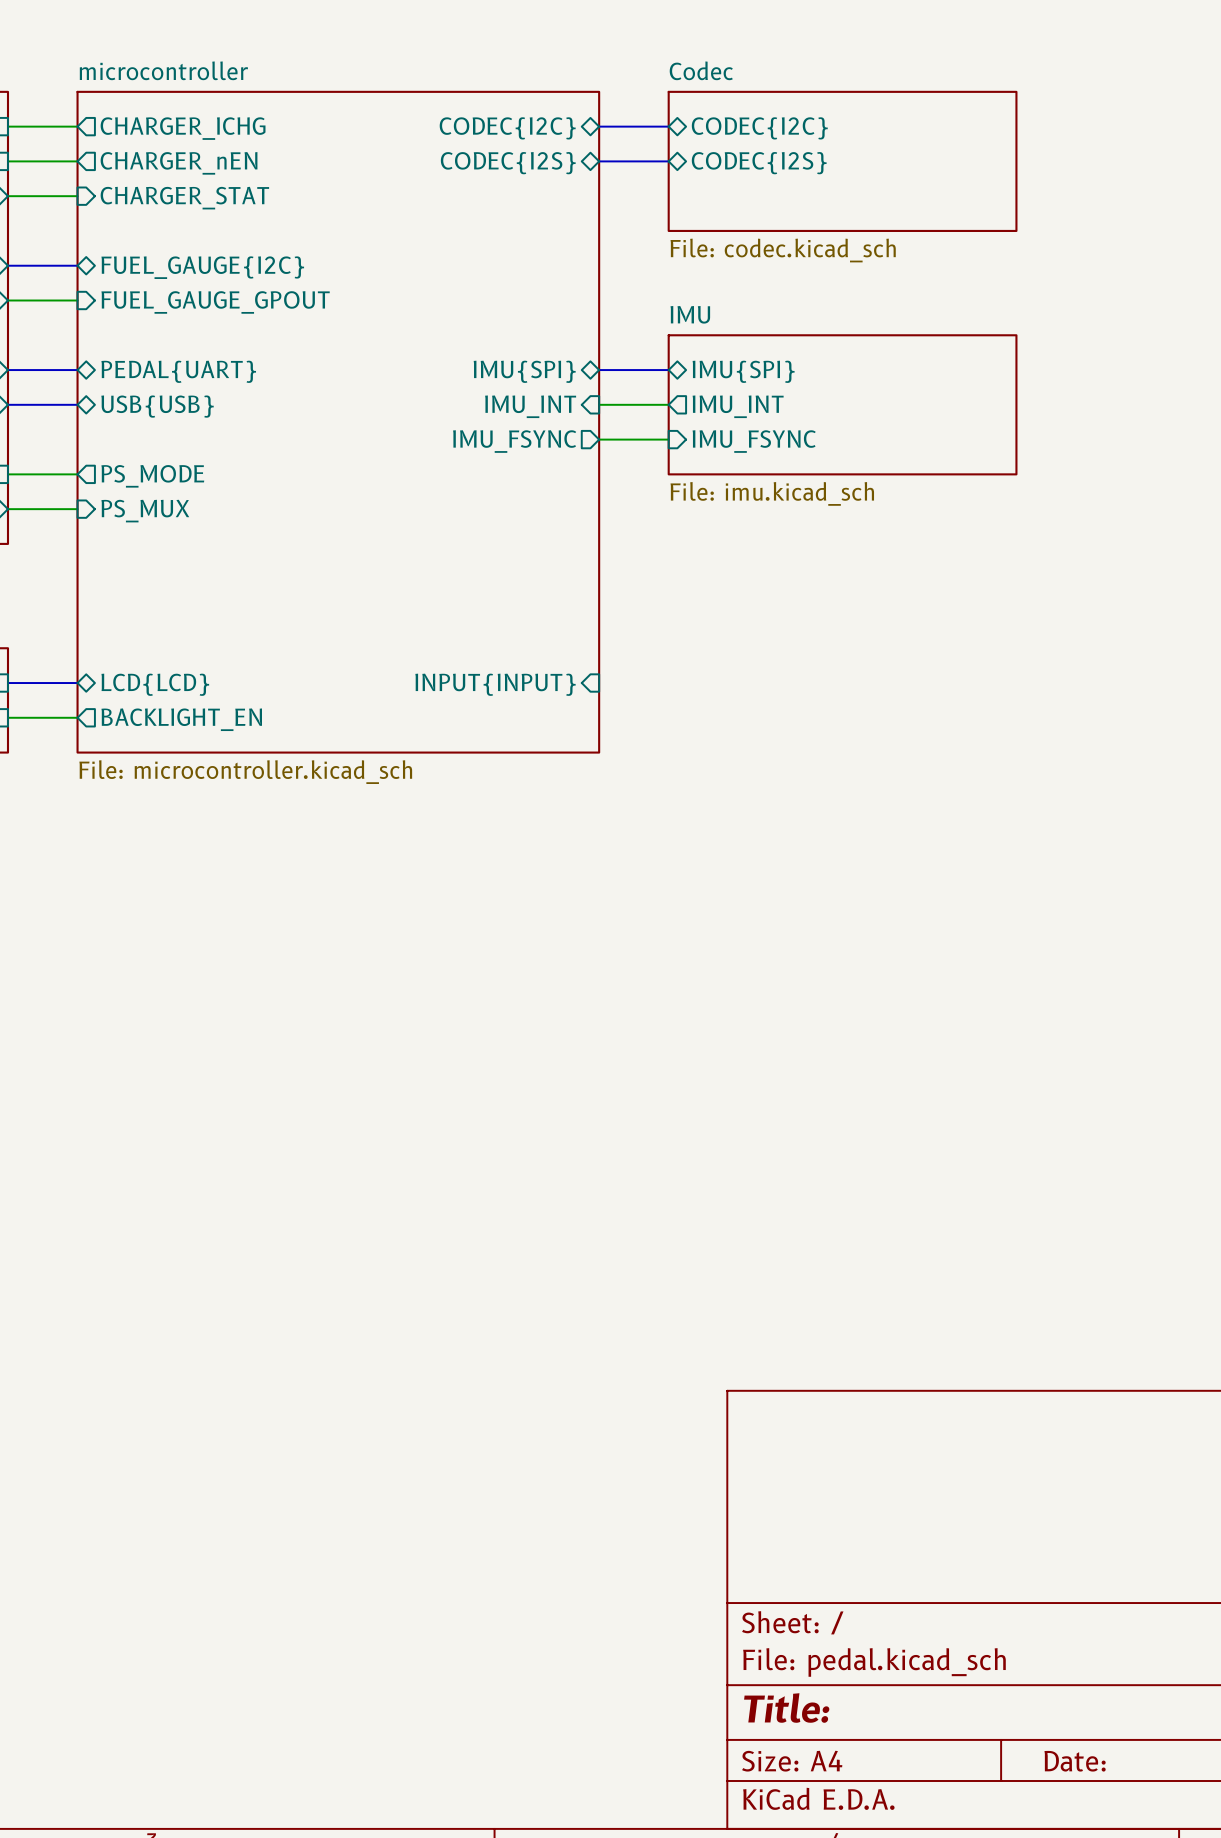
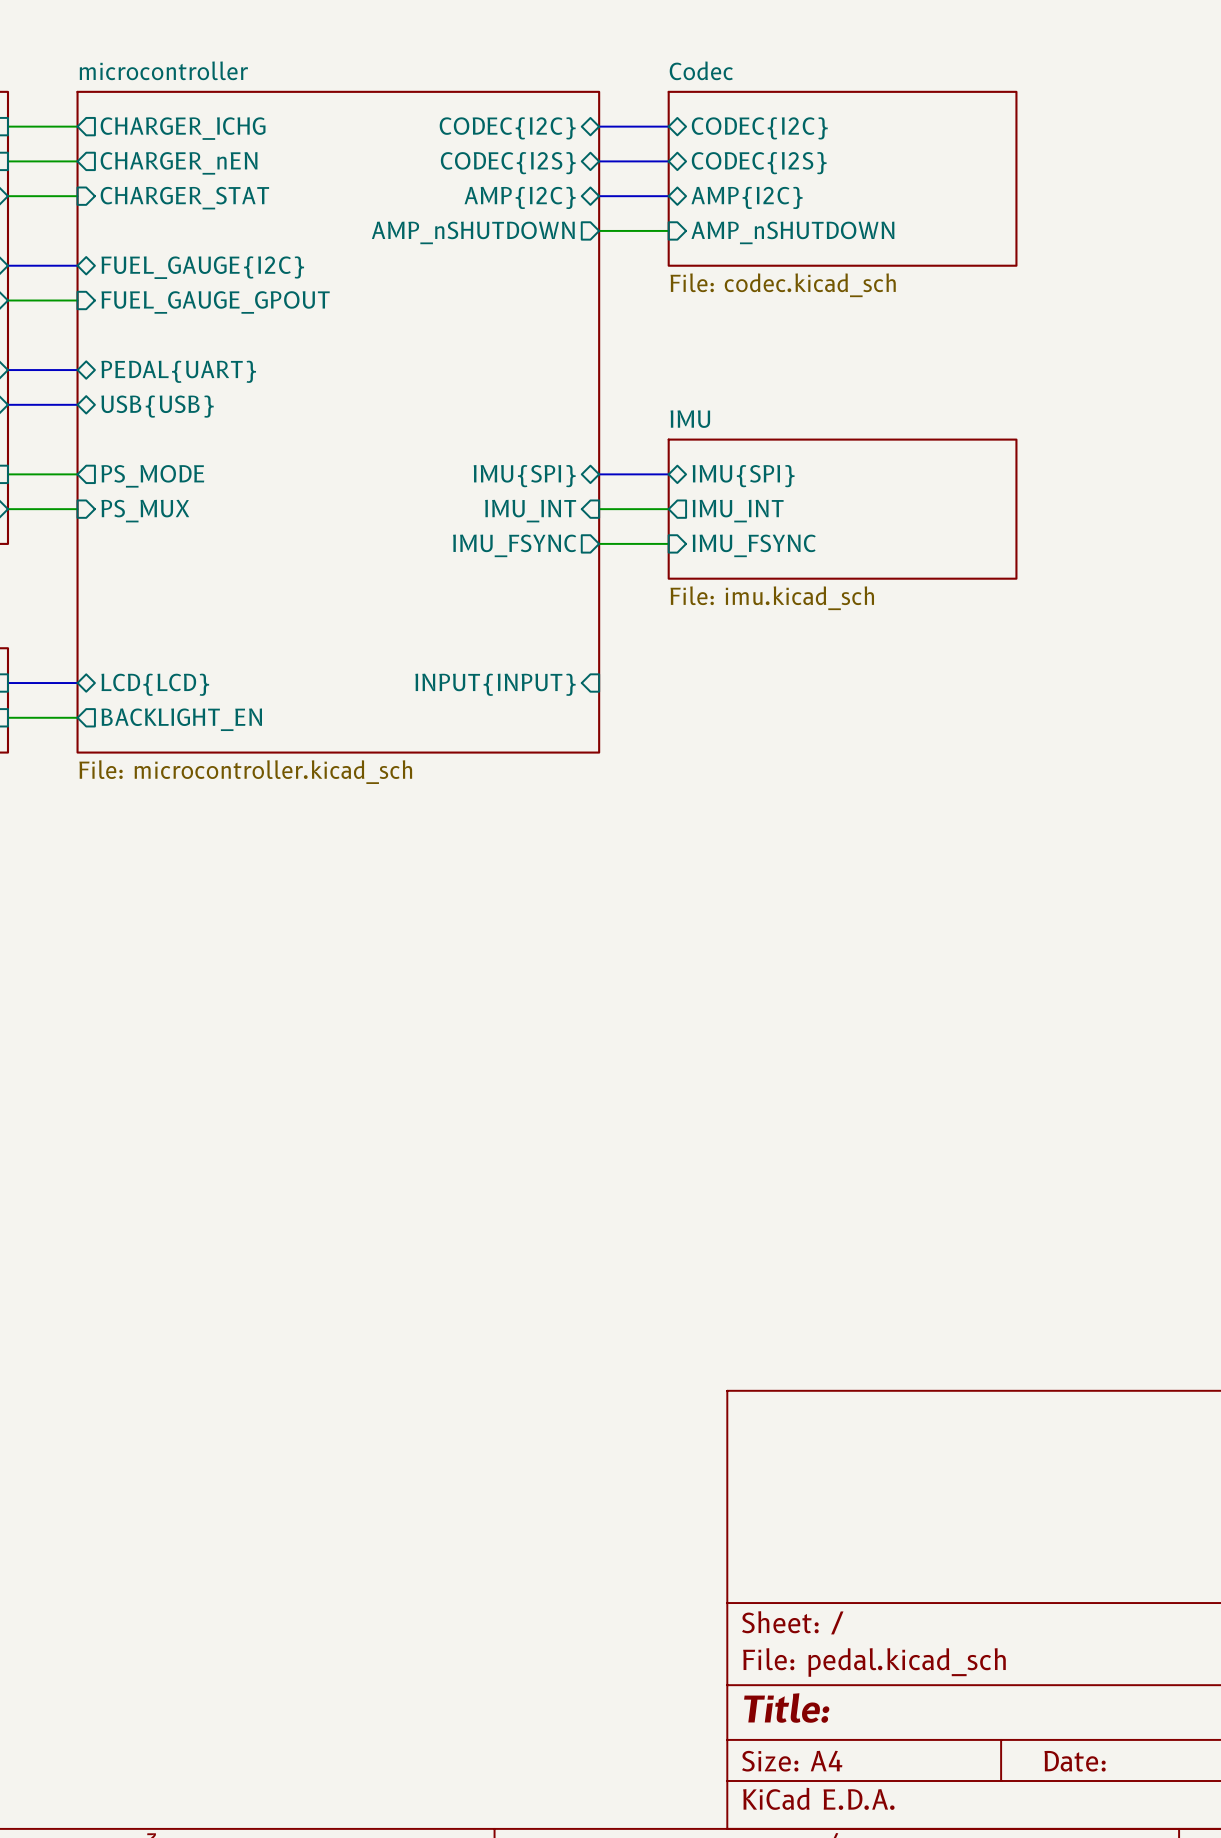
sheet Codec: File: codec.kicad_sch (842, 161) -> none
sheet Codec: none -> File: codec.kicad_sch (842, 178)
bus: none -> (599, 196) (668, 196)
sheet pin: none -> AMP{I2C} (520, 197)
sheet pin: none -> AMP{I2C} (747, 197)
wire: none -> (599, 230) (668, 230)
sheet pin: none -> AMP_nSHUTDOWN (473, 232)
sheet pin: none -> AMP_nSHUTDOWN (792, 232)
bus: (599, 370) (668, 370) -> (599, 474) (668, 474)
sheet pin: IMU{SPI} (524, 371) -> none
sheet pin: IMU{SPI} (743, 371) -> none
wire: (599, 404) (668, 404) -> (599, 509) (668, 509)
sheet IMU position: (842, 404) -> (842, 509)
sheet pin: IMU_INT (530, 406) -> none
sheet pin: IMU_INT (738, 406) -> none
wire: (599, 439) (668, 439) -> (599, 543) (668, 543)
sheet pin: IMU_FSYNC (514, 441) -> none
sheet pin: IMU_FSYNC (754, 441) -> none
sheet pin: none -> IMU{SPI} (524, 476)
sheet pin: none -> IMU{SPI} (743, 476)
sheet pin: none -> IMU_INT (530, 511)
sheet pin: none -> IMU_INT (738, 511)
sheet pin: none -> IMU_FSYNC (514, 545)
sheet pin: none -> IMU_FSYNC (754, 545)

